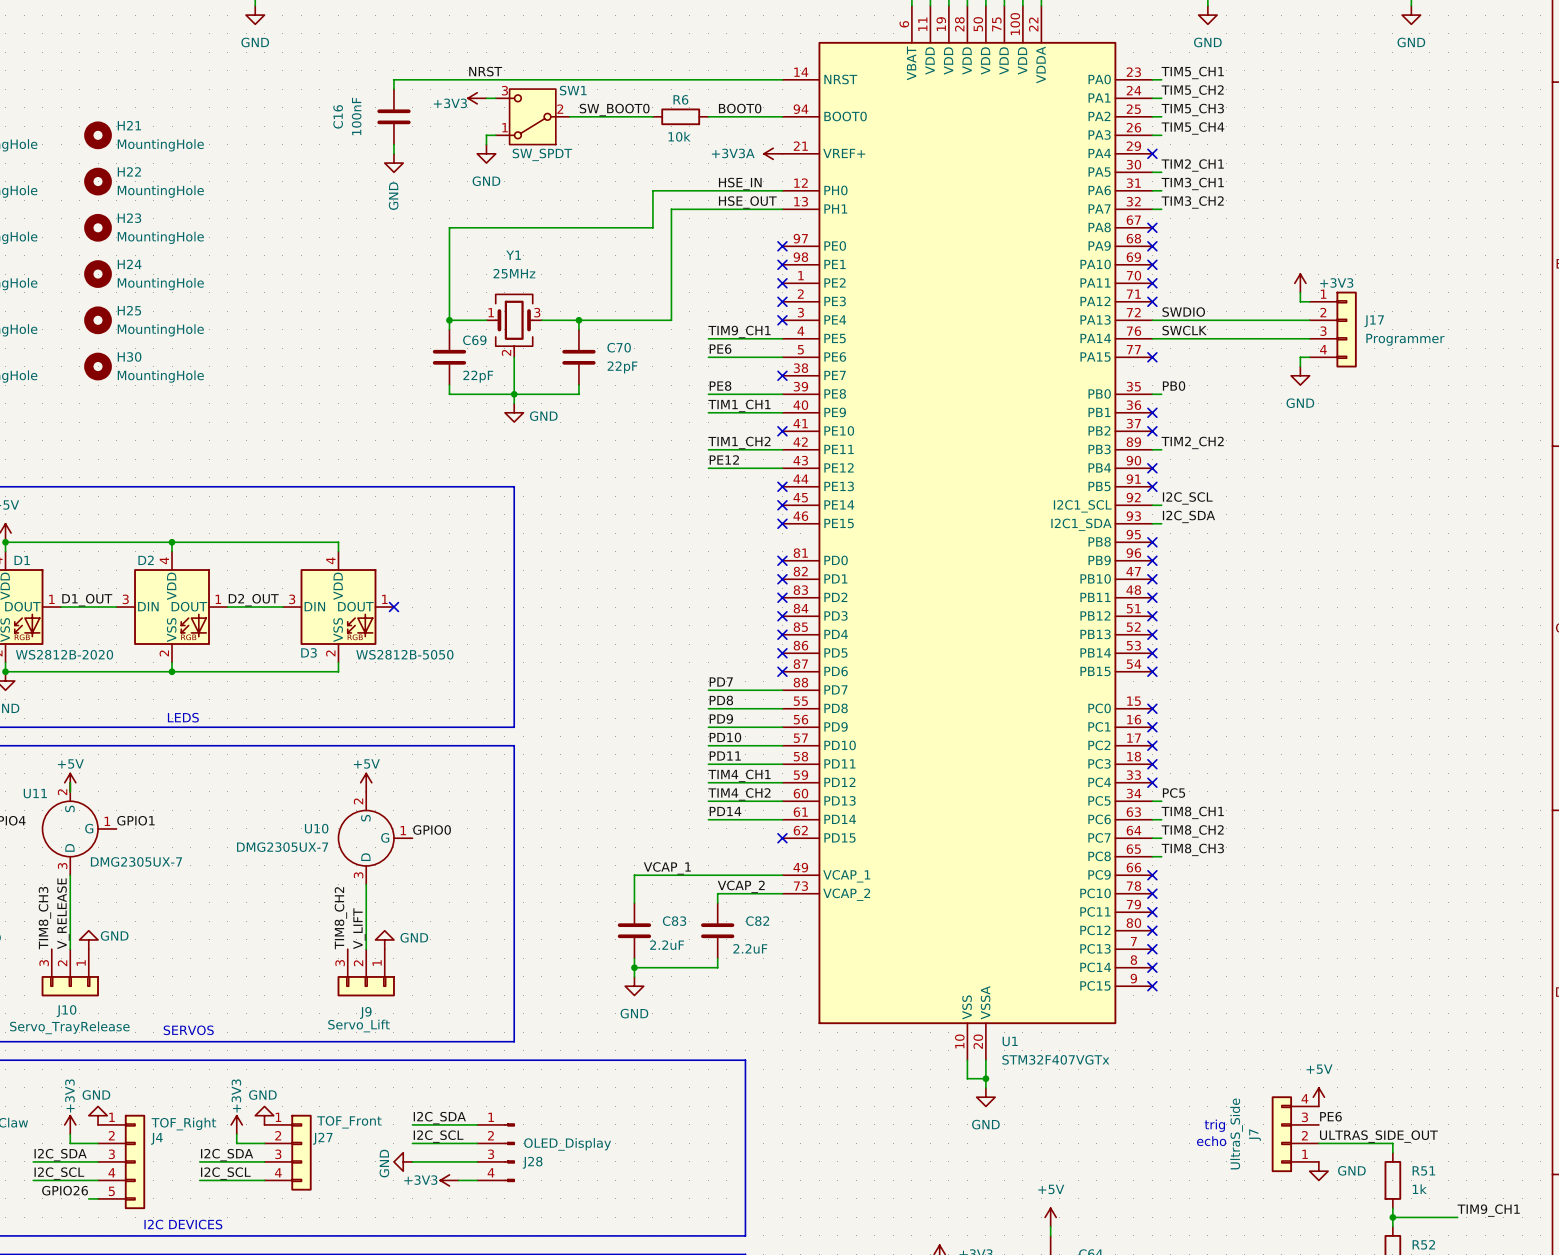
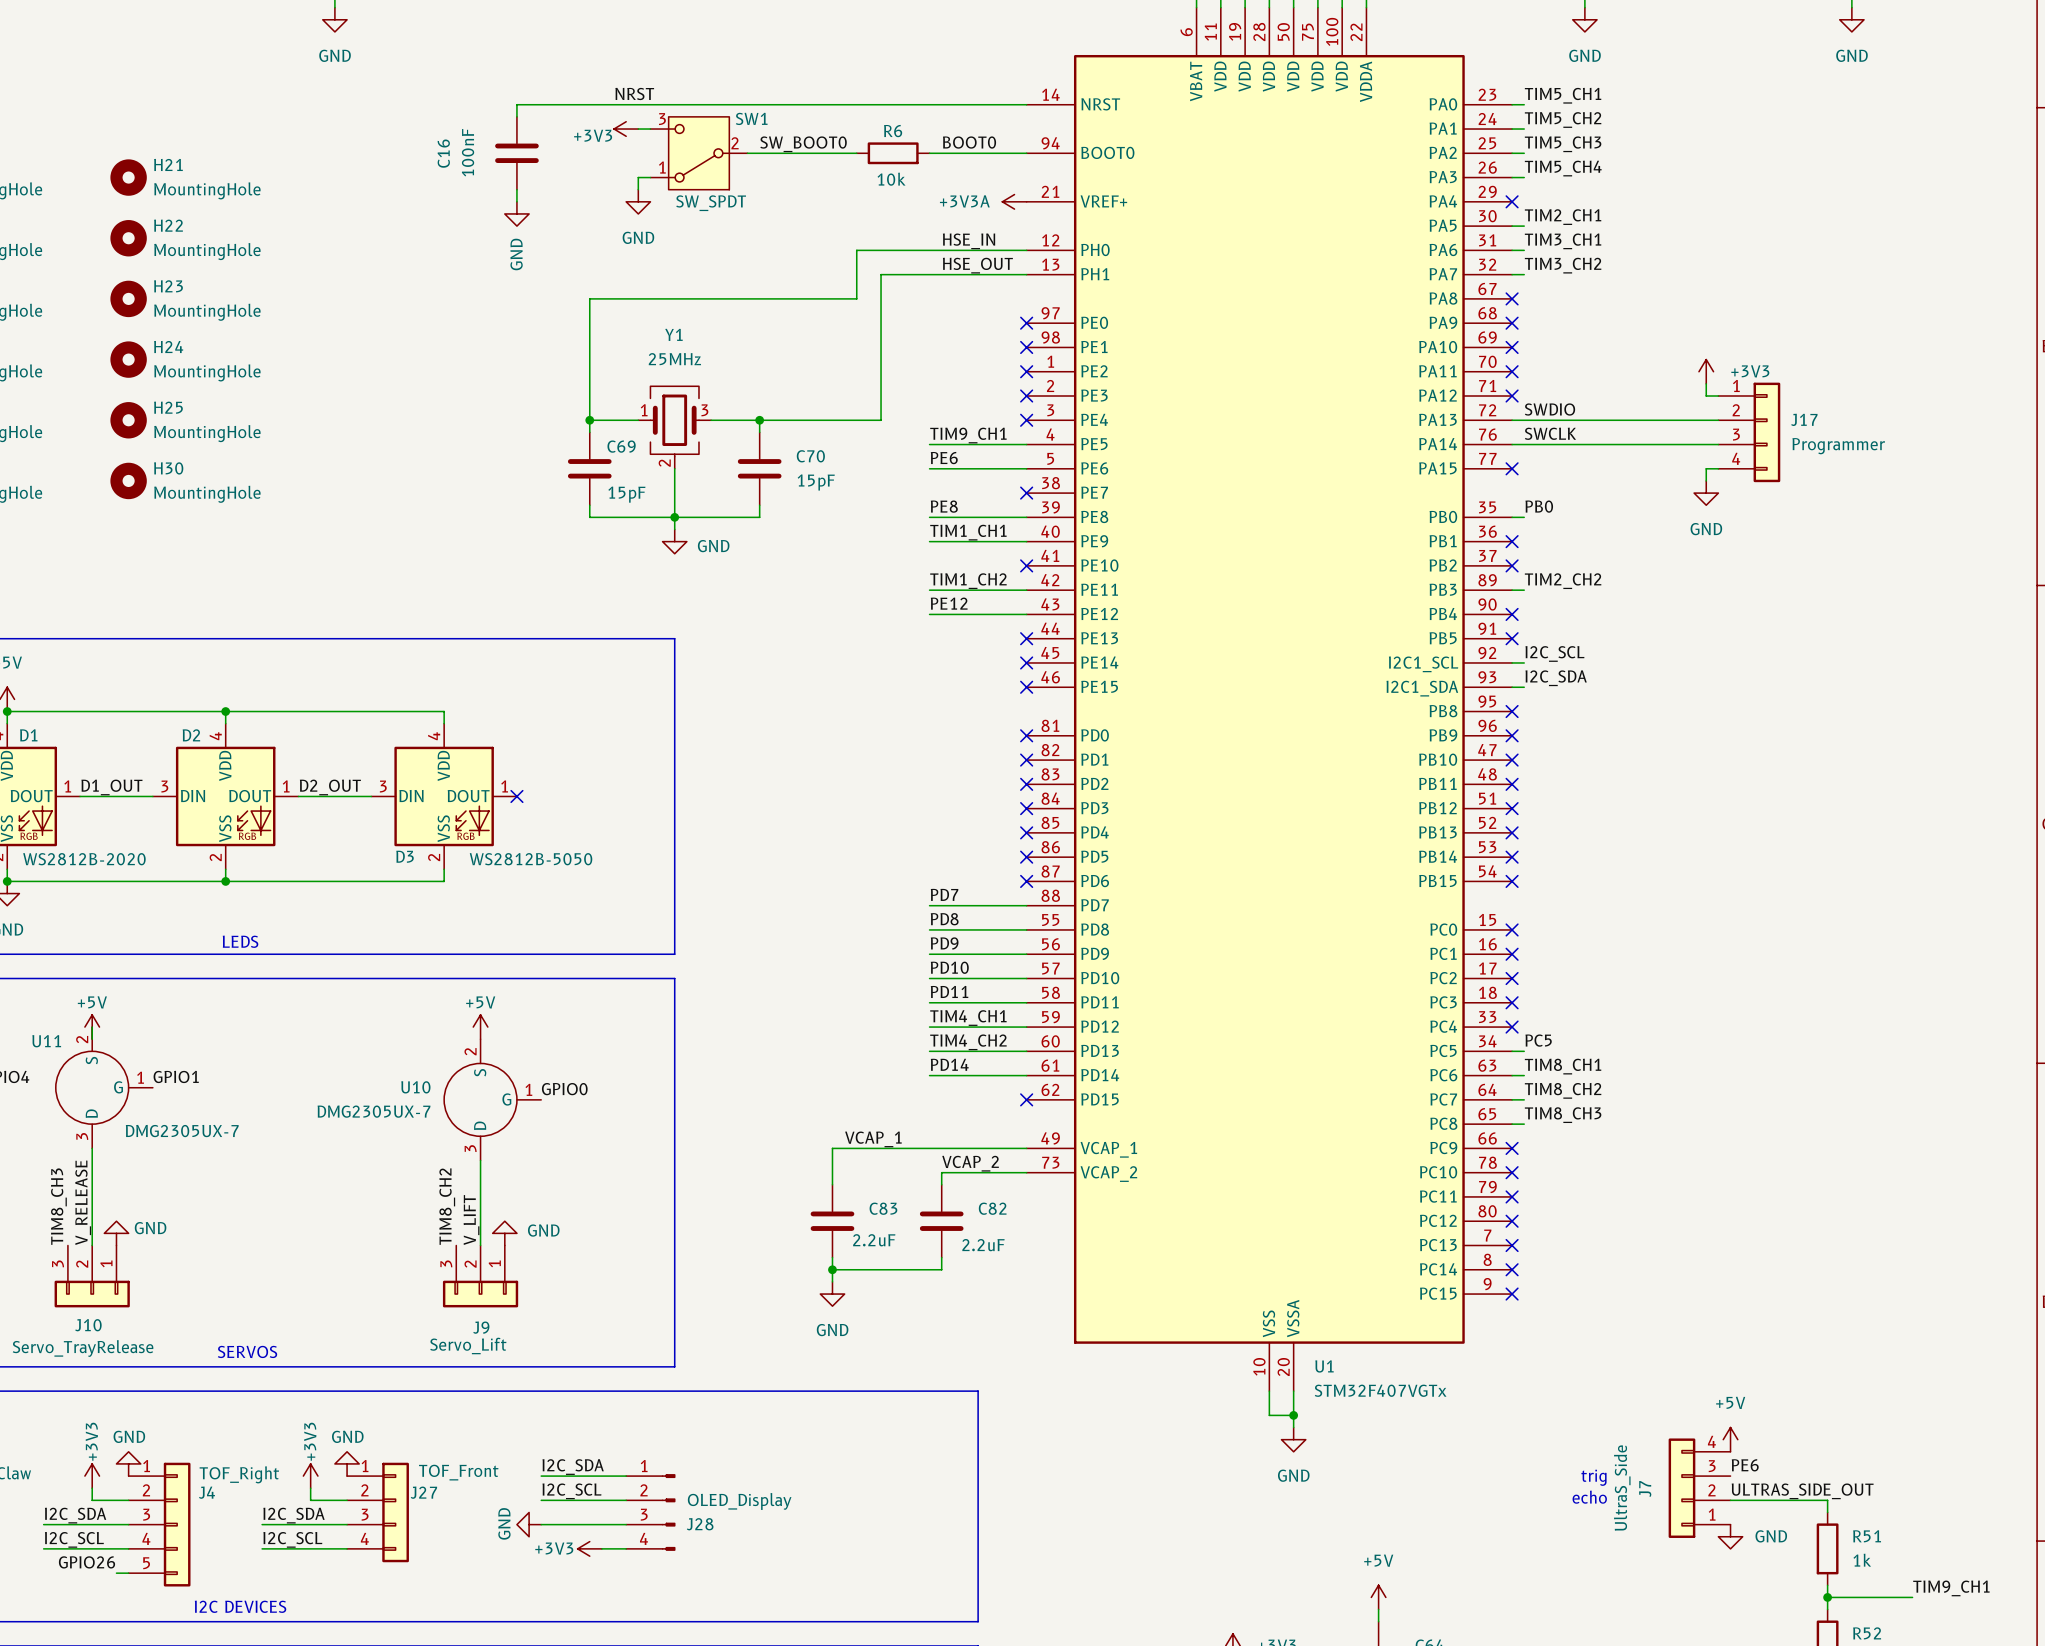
C70 value: 22pF (622, 367) -> 15pF (816, 482)
C69 value: 22pF (478, 376) -> 15pF (626, 494)

